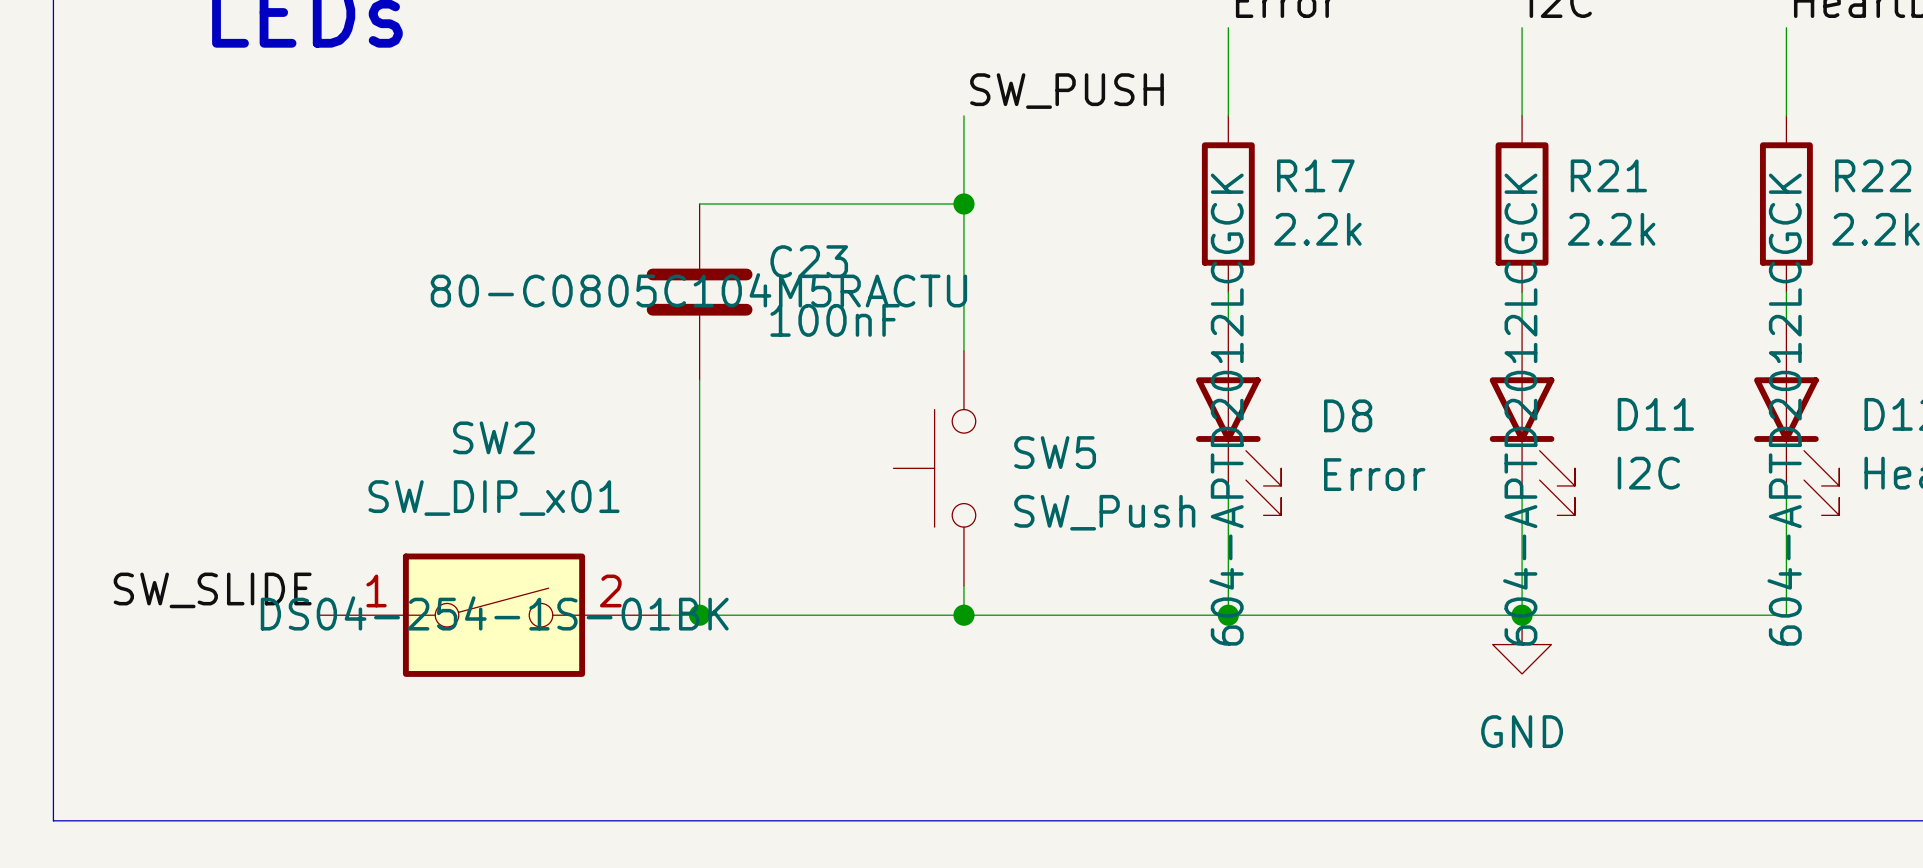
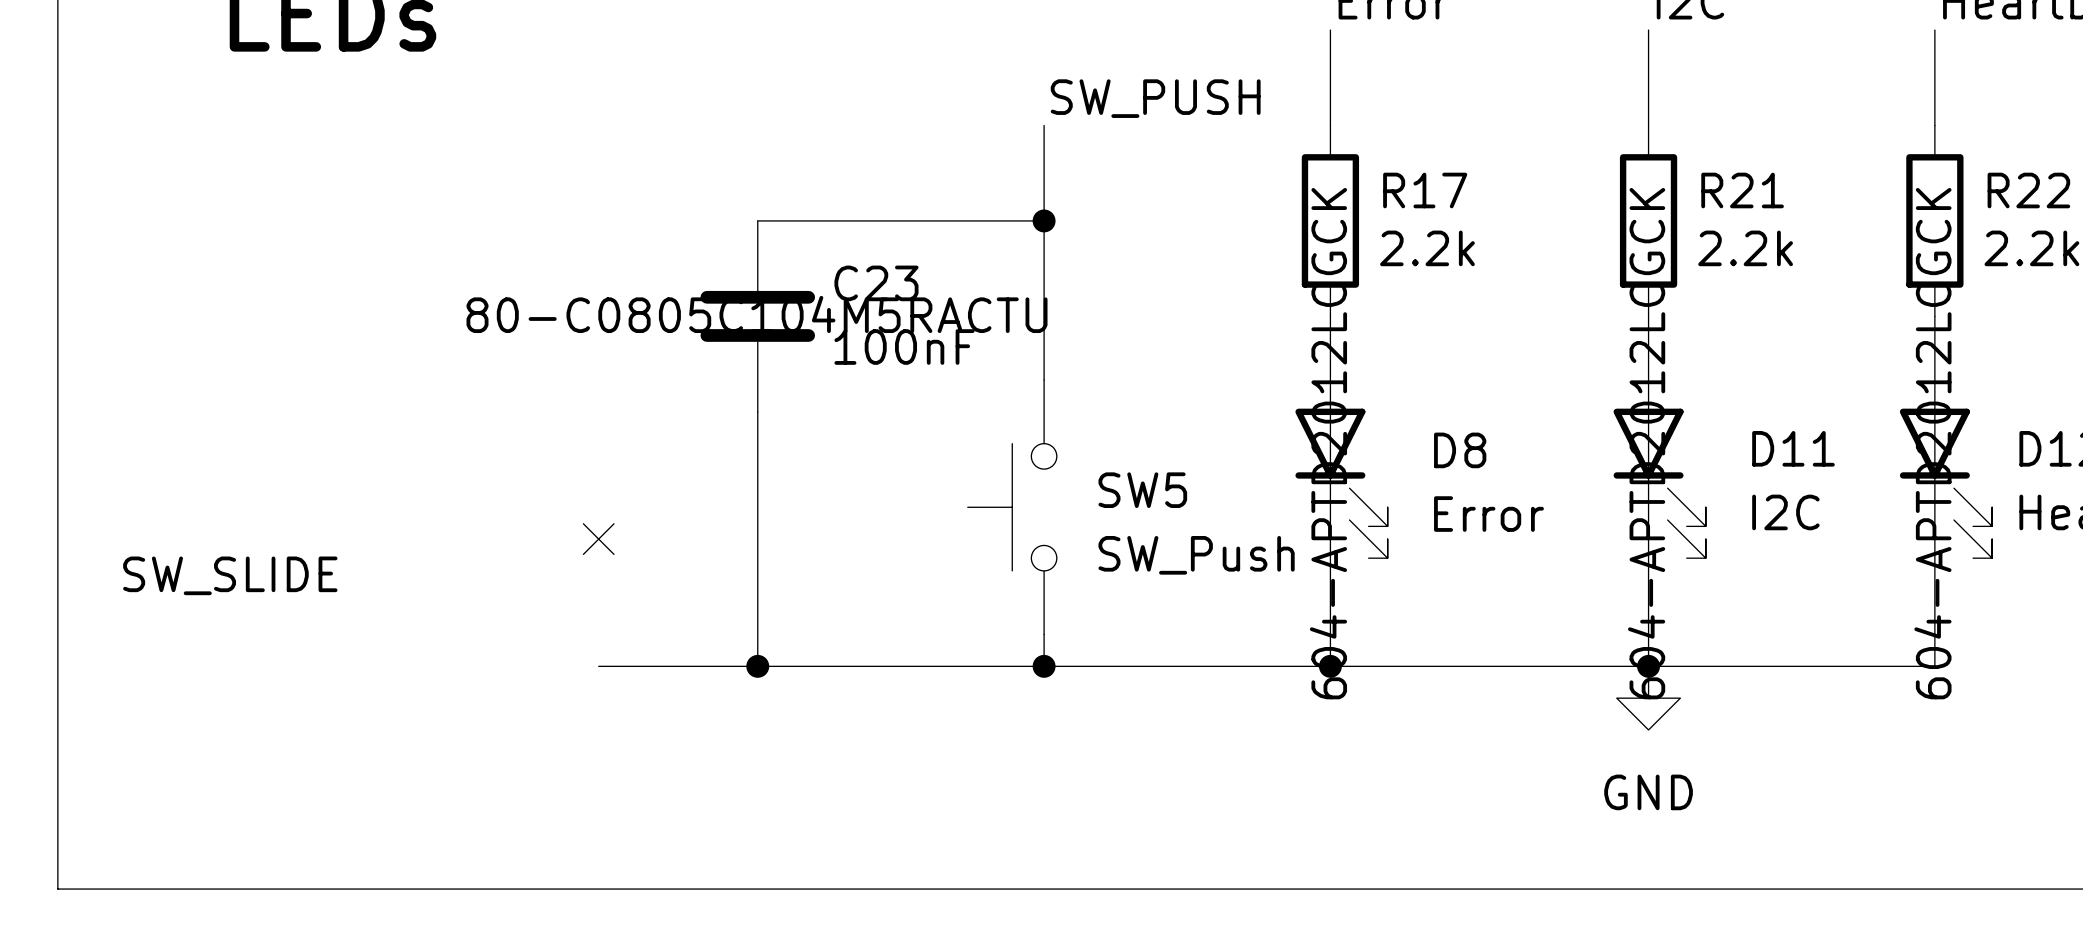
no-connect mark: none -> (598, 539)
label position: SW_SLIDE (212, 590) -> SW_SLIDE (230, 575)
SW2: SW_DIP_x01 (494, 615) -> none

